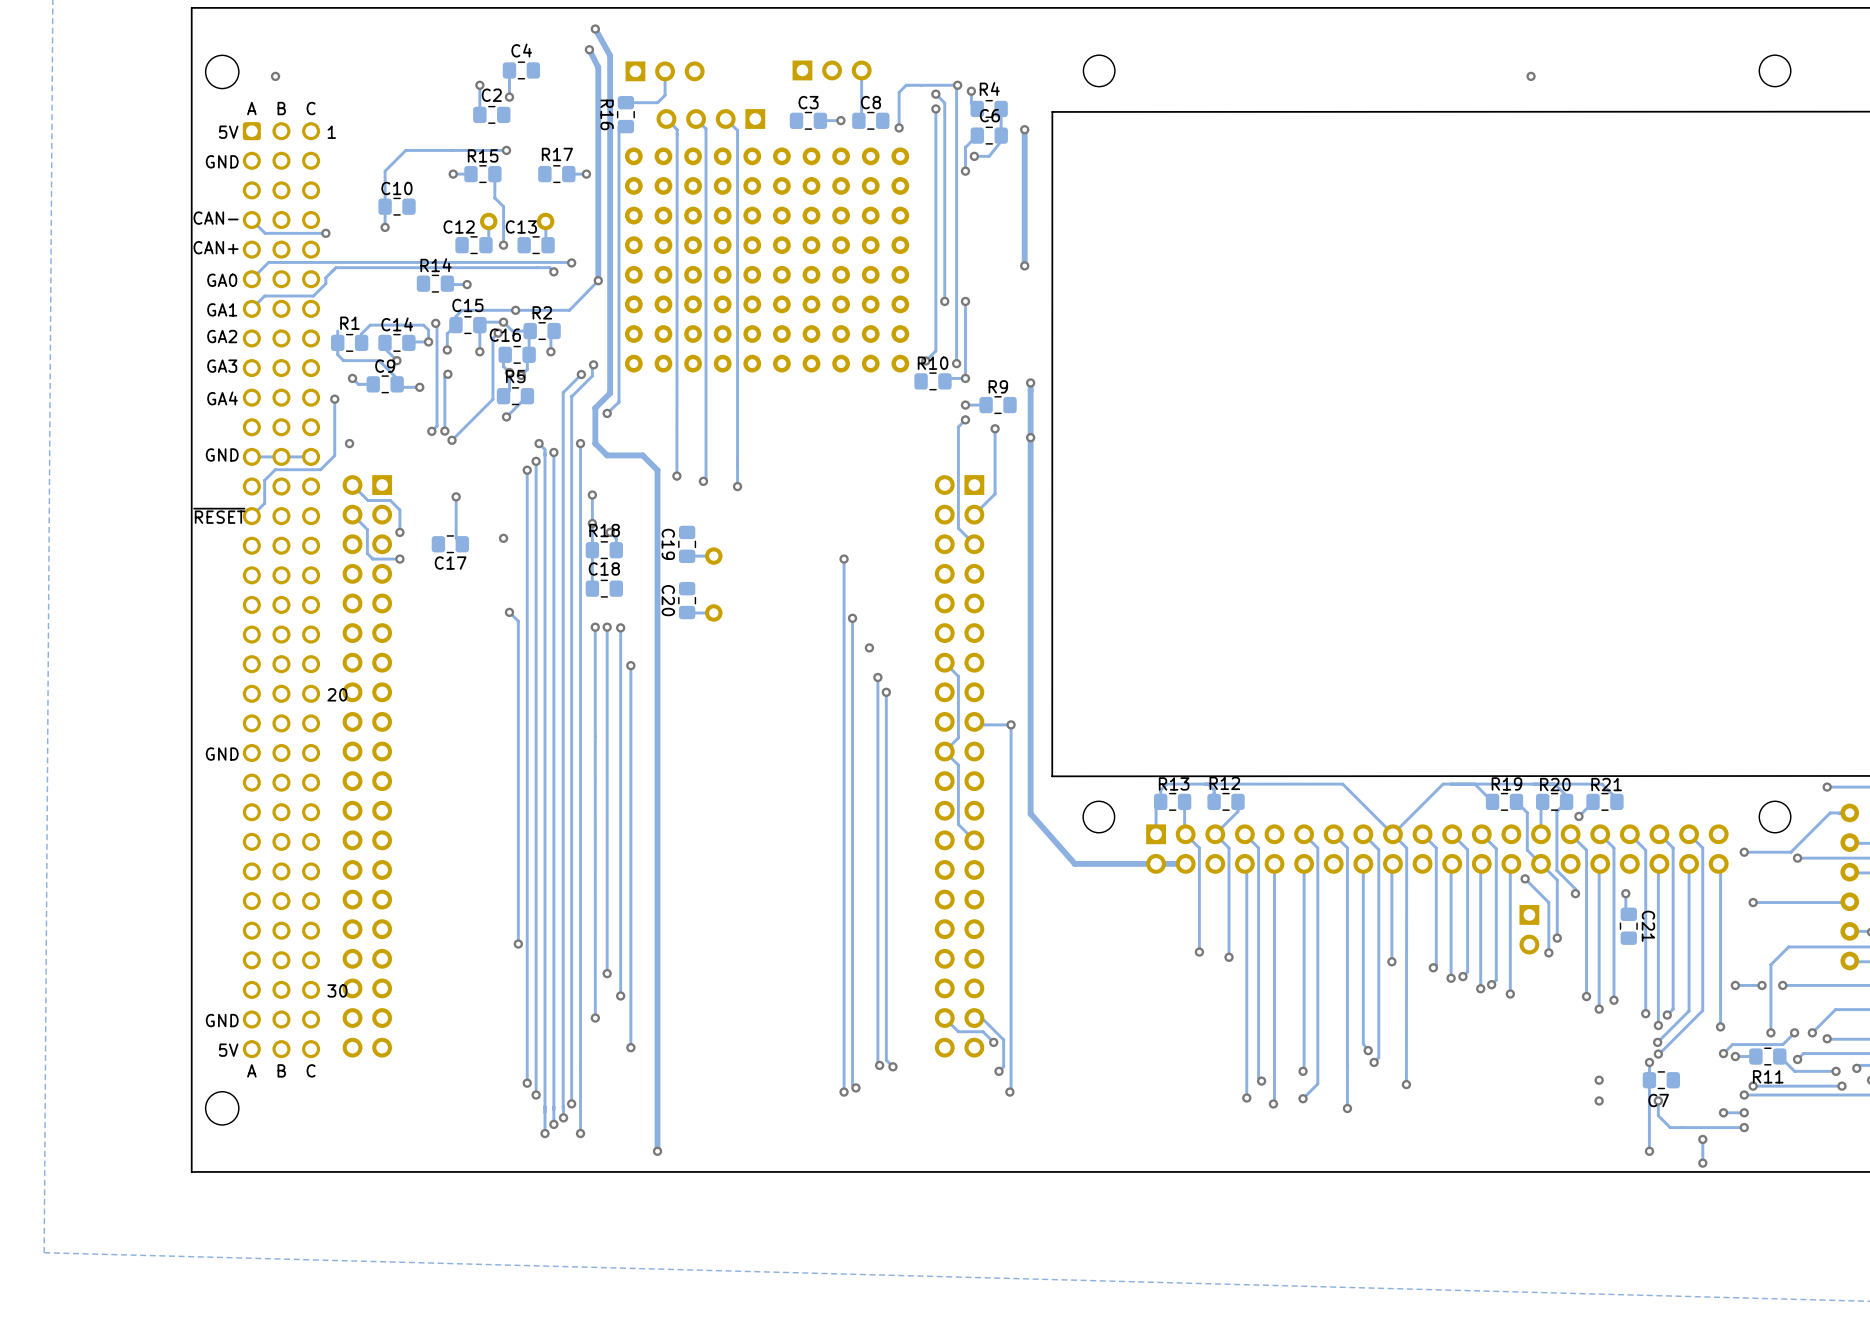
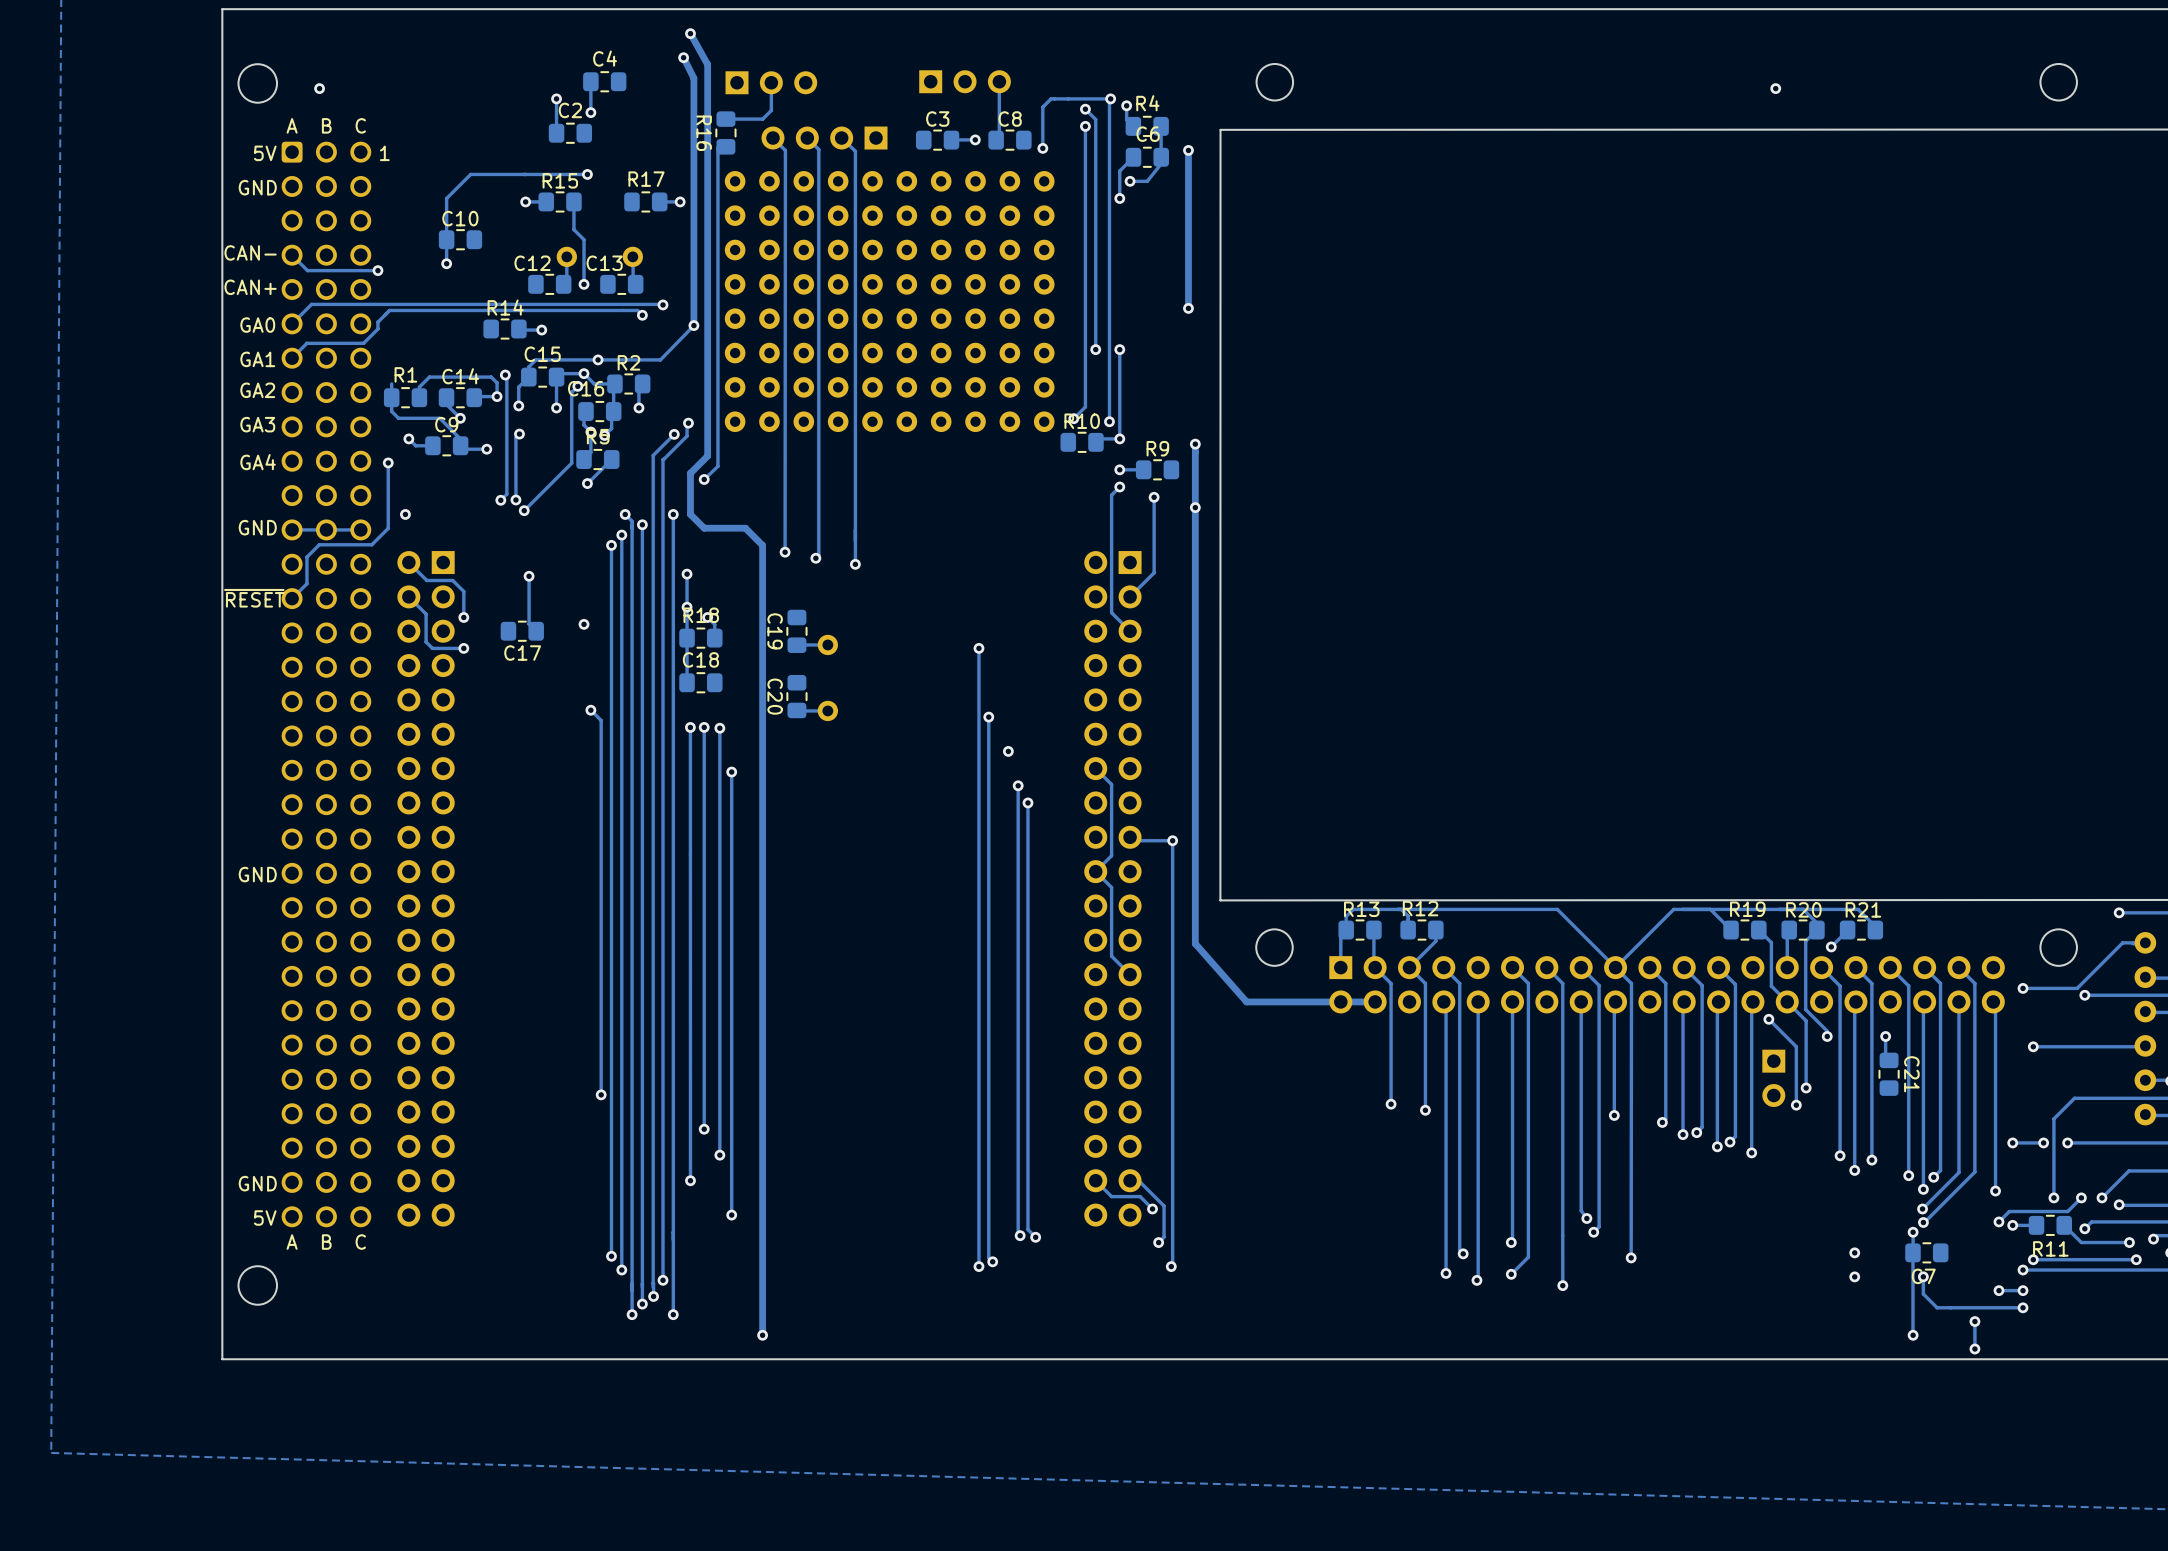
text: 20 (337, 694) -> none
text: 30 (337, 990) -> none

